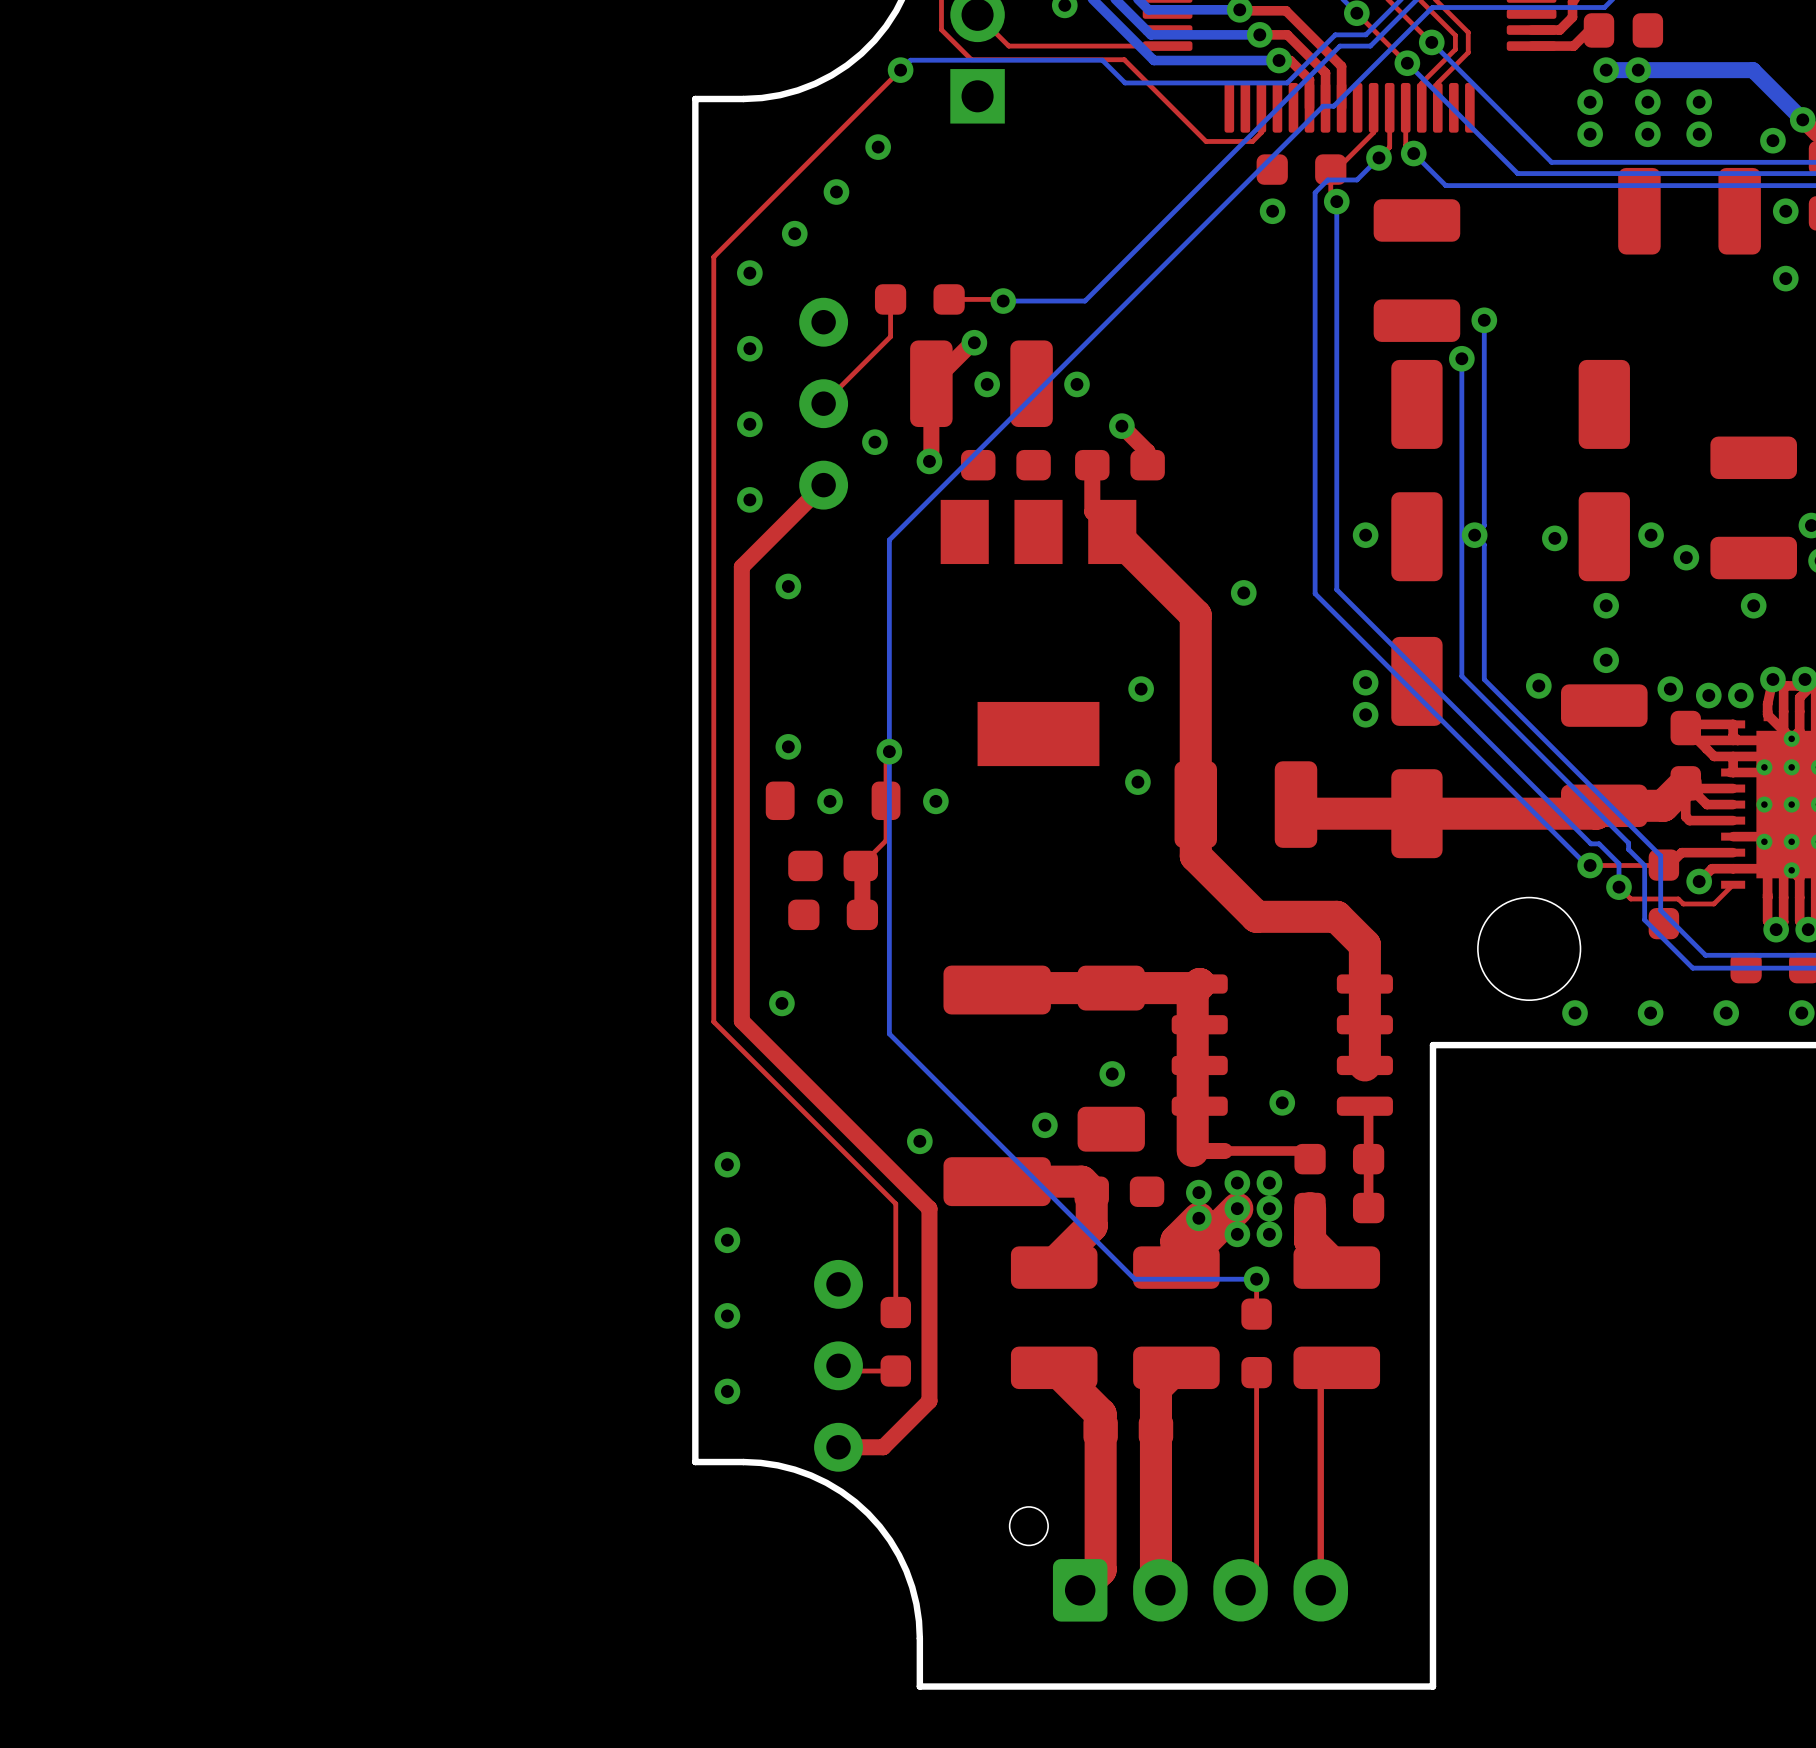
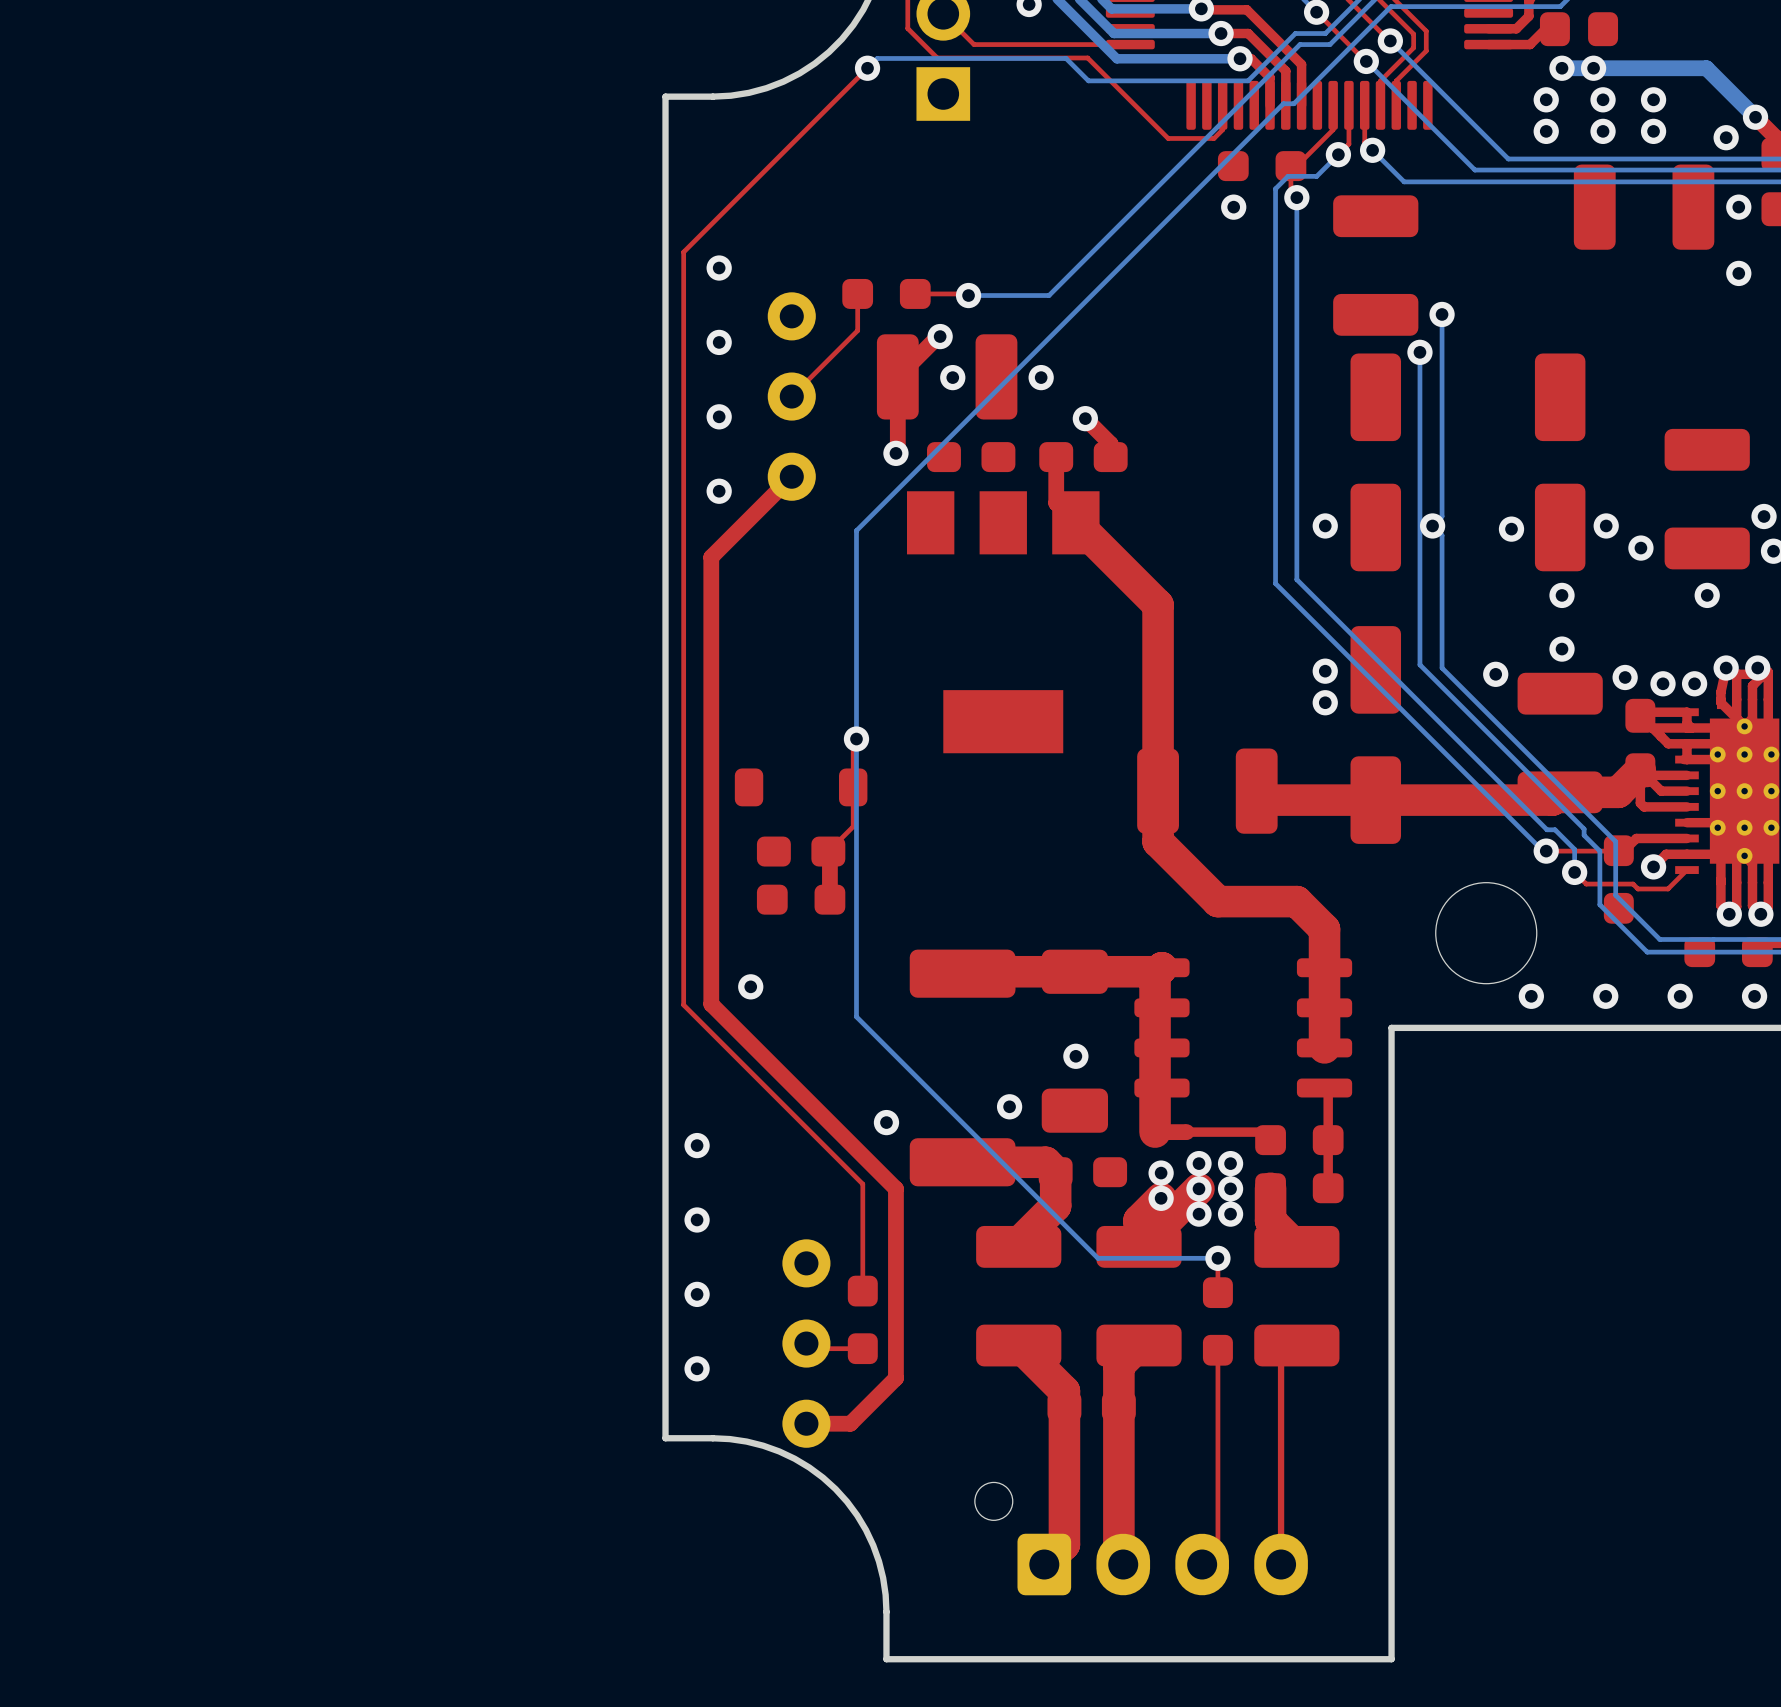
via: (878, 147) -> none
via: (836, 192) -> none
via: (794, 233) -> none
via: (874, 442) -> none
via: (788, 586) -> none
via: (1243, 592) -> none
via: (1141, 689) -> none
via: (788, 746) -> none
via: (1137, 782) -> none
via: (830, 801) -> none
via: (935, 801) -> none
via: (1282, 1102) -> none

